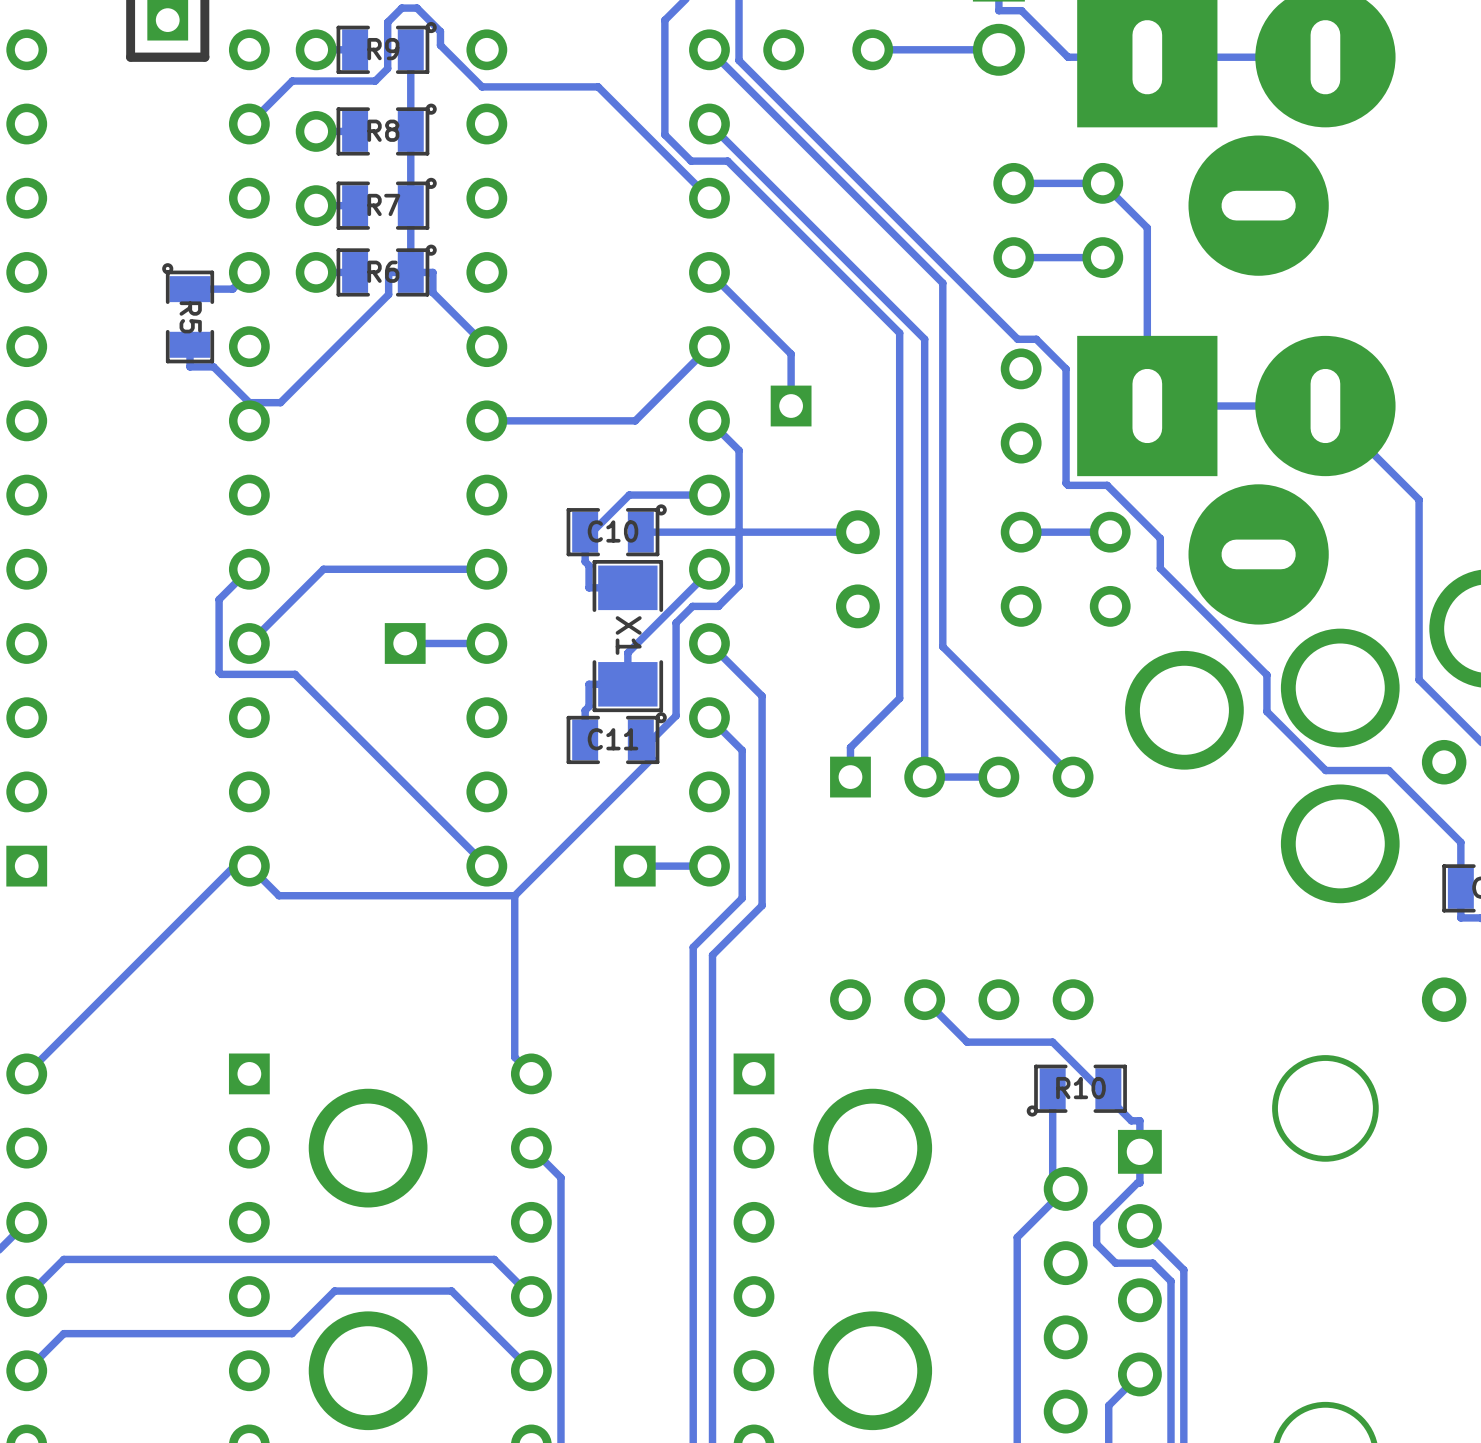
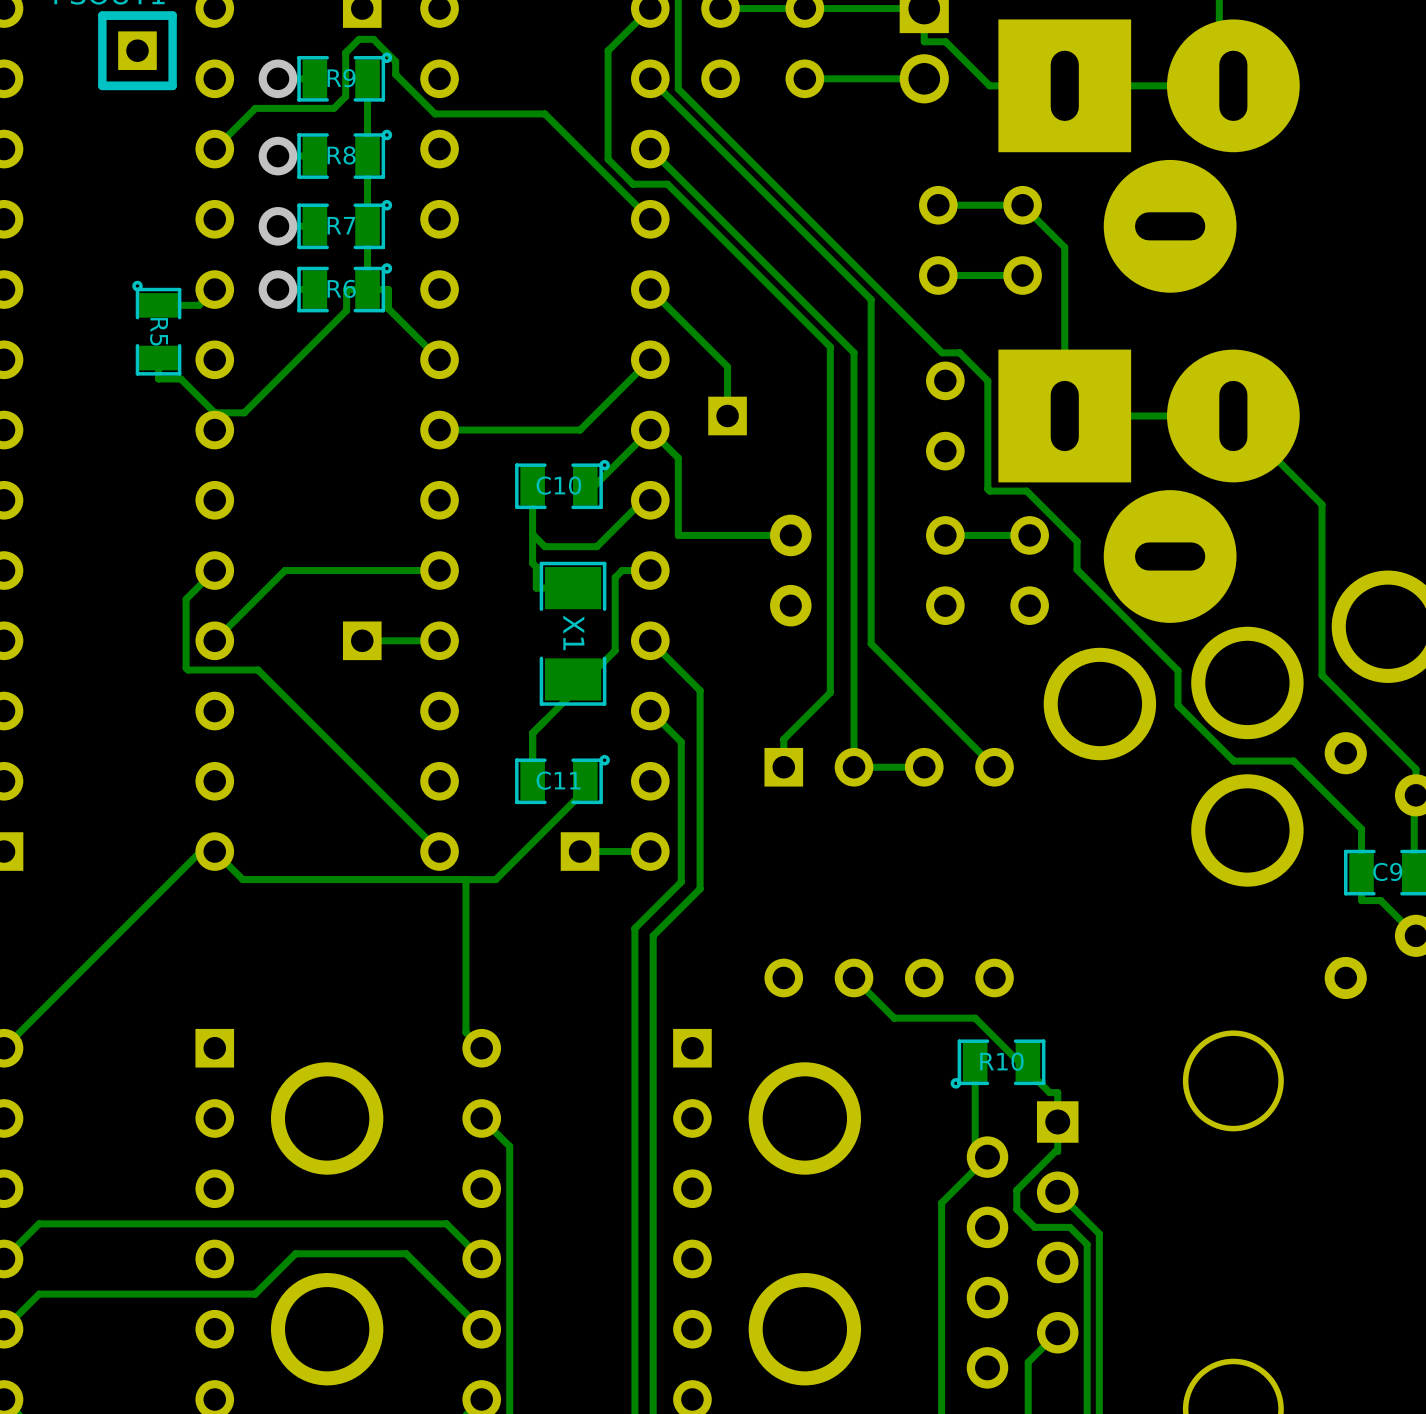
track: none -> (650, 430) (594, 486) (585, 486)
track: (702, 495) (629, 495) (585, 539) -> (643, 500) (596, 546) (544, 546) (532, 534) (532, 486)
C10 position: (616, 530) -> (562, 484)
track: (640, 532) (739, 532) (739, 585) (718, 606) (692, 606) (676, 622) (676, 715) (651, 739) -> none
track: (709, 569) (627, 652) (627, 684) (589, 684) (589, 706) (585, 710) (585, 739) -> (650, 570) (622, 570) (615, 577) (615, 650) (532, 733) (532, 781)
C11 position: (616, 738) -> (562, 779)
track: (651, 739) (651, 758) (514, 895) -> (585, 781) (585, 790) (495, 879) (465, 879)

